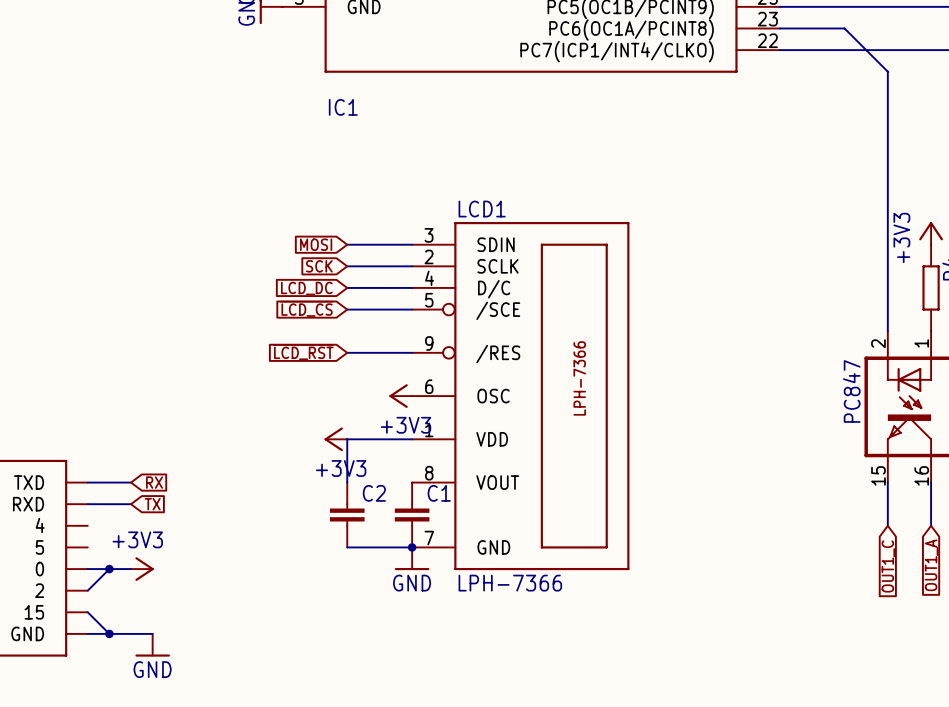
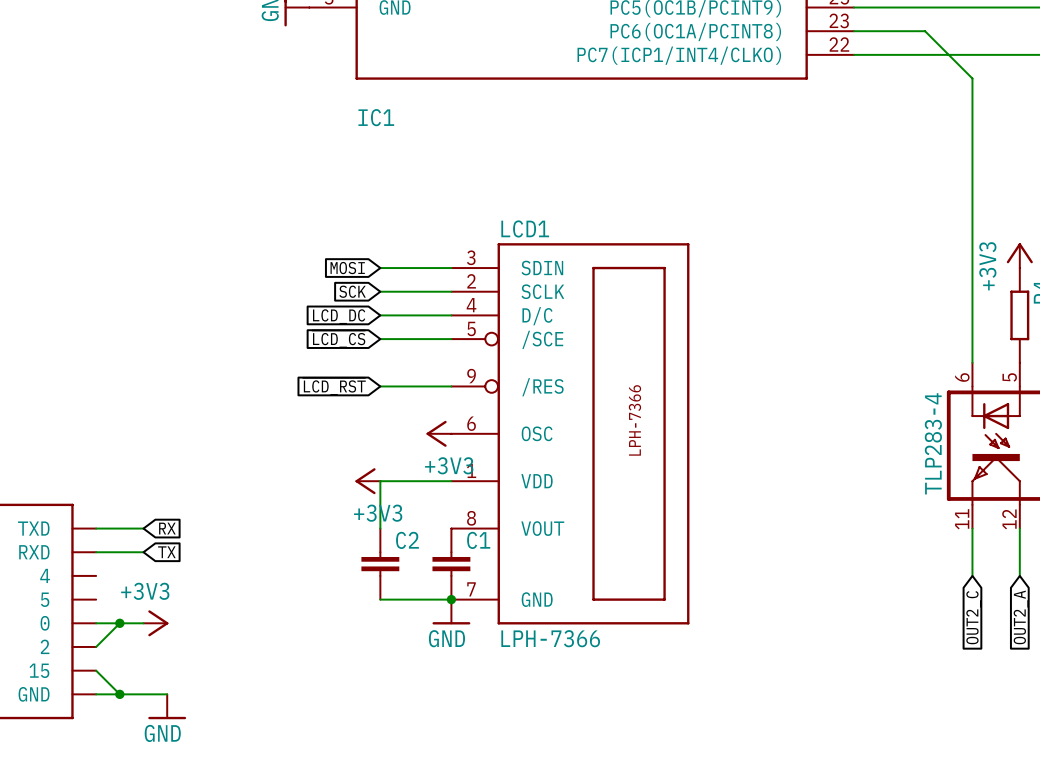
part pin number: 2 (878, 343) -> 6 (962, 377)
part pin number: 1 (921, 343) -> 5 (1009, 377)
part value: PC847 (851, 391) -> TLP283-4 (933, 443)
part pin number: 15 (878, 475) -> 11 (962, 519)
part pin number: 16 (921, 475) -> 12 (1009, 519)
global label: OUT1_A (931, 565) -> OUT2_A (1021, 617)
global label: OUT1_C (888, 566) -> OUT2_C (973, 617)

